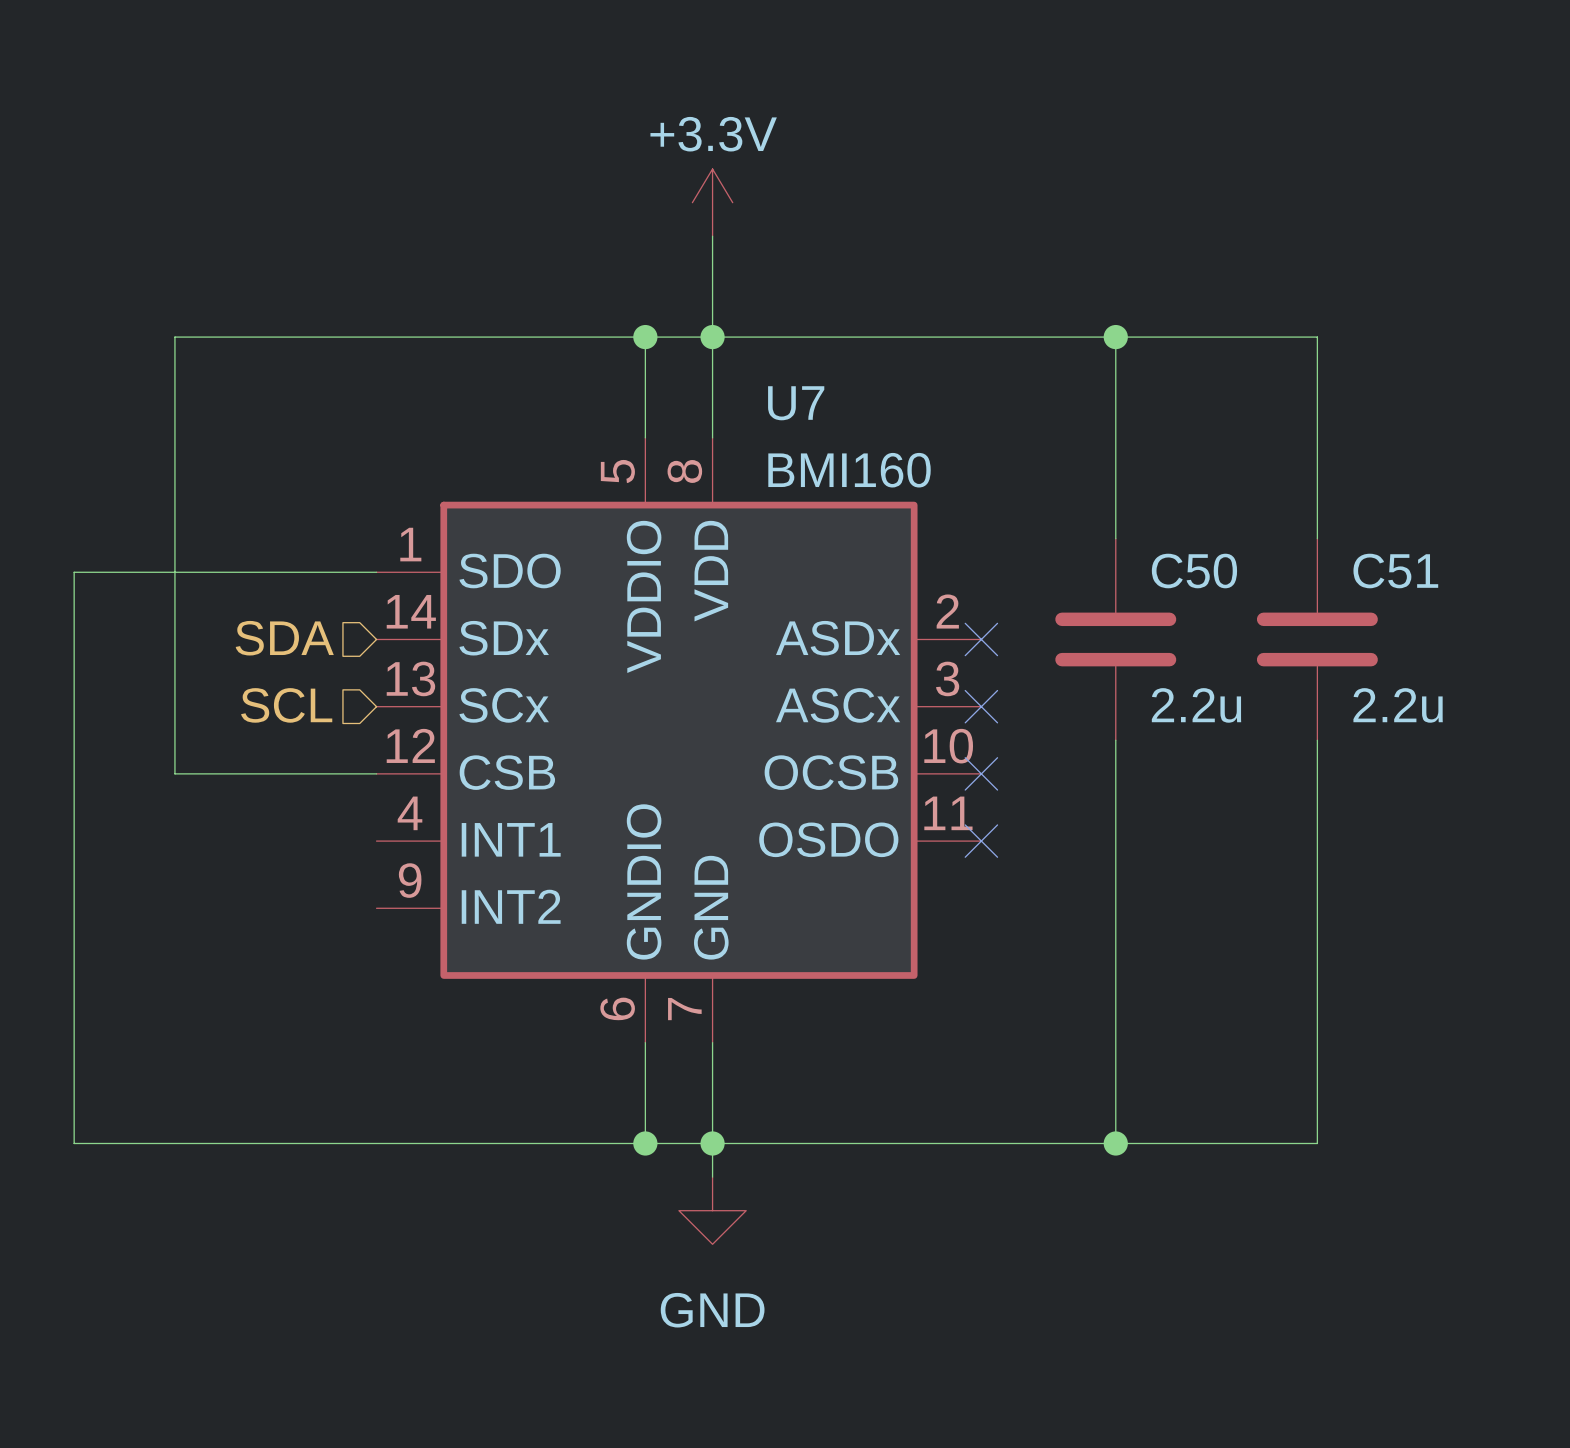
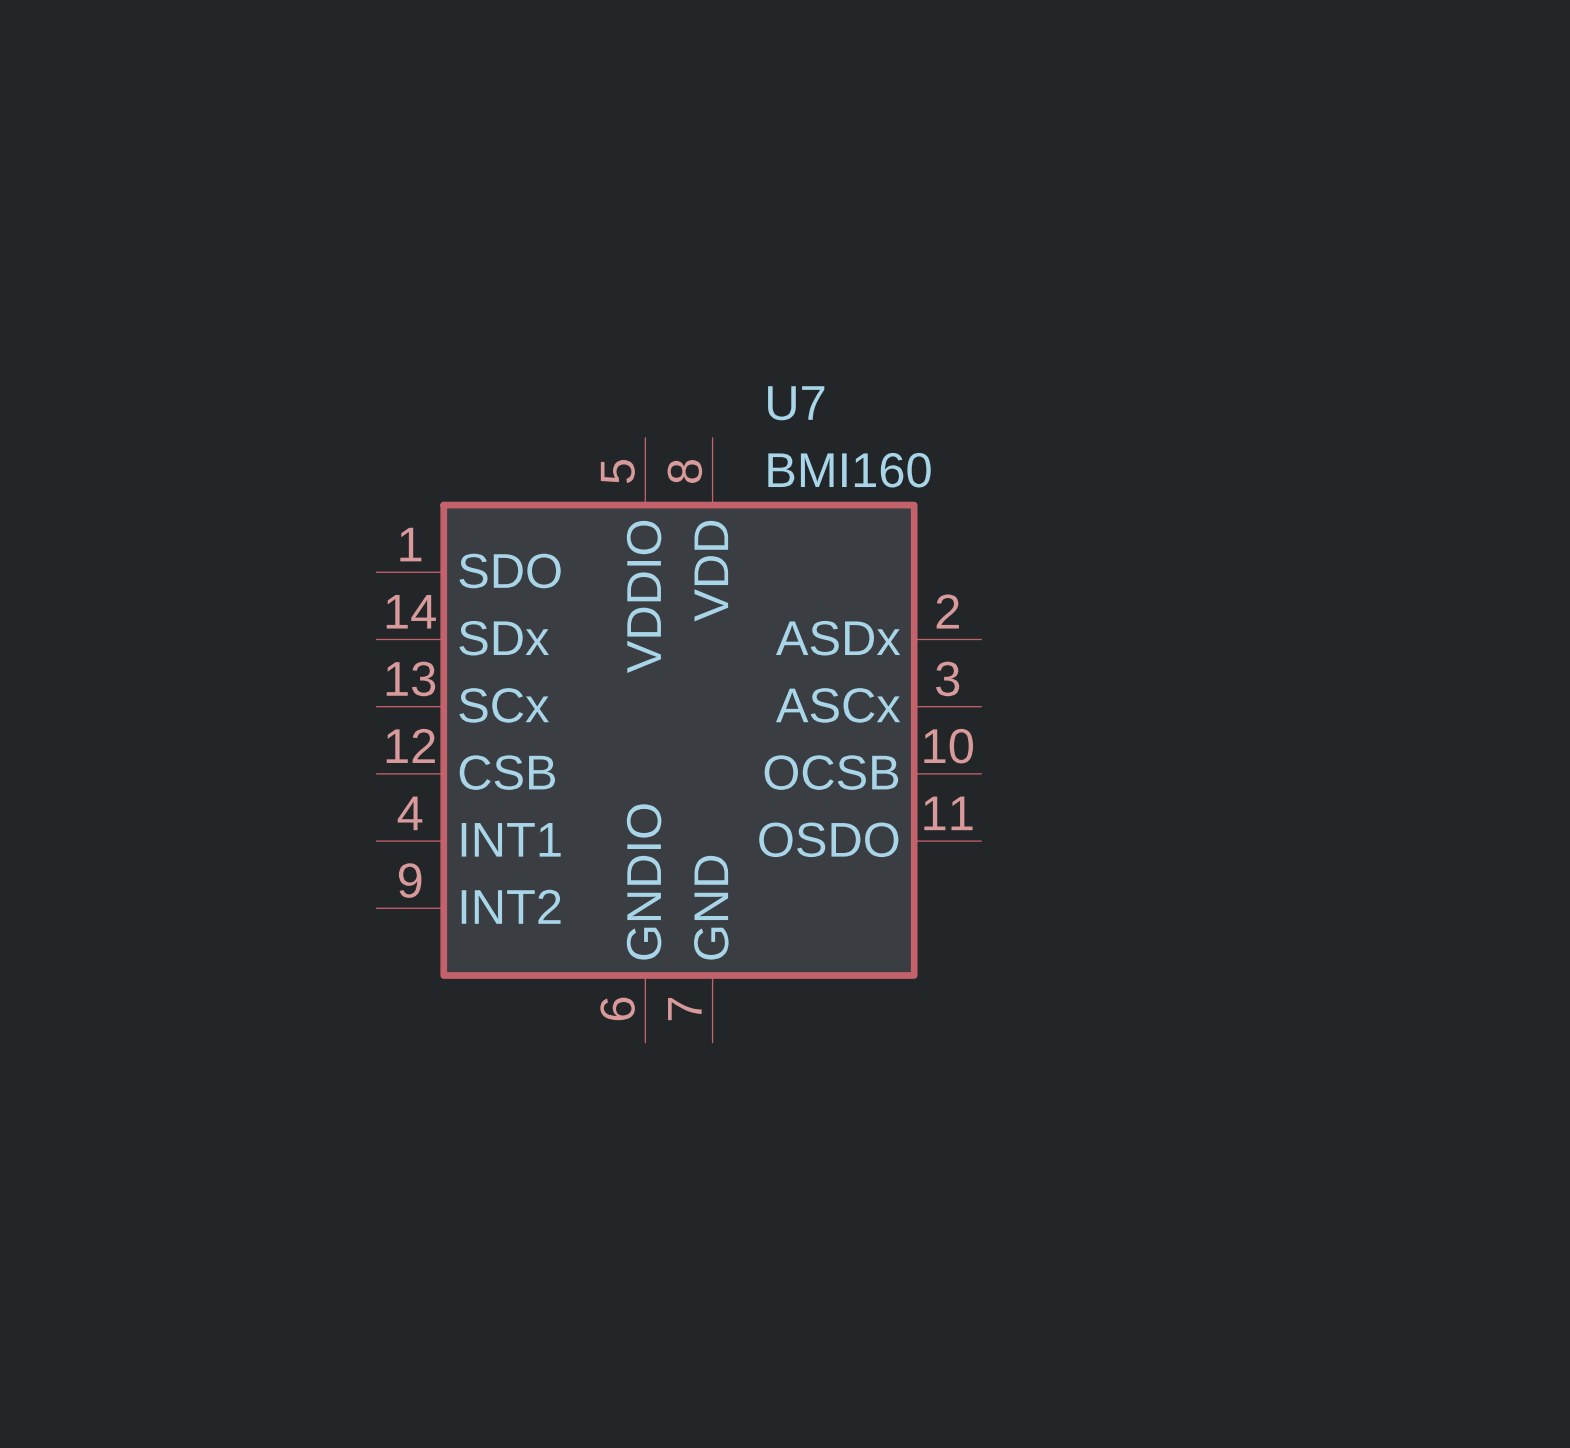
power symbol: +3.3V (712, 202) -> none
wire: (712, 236) (712, 437) -> none
wire: (645, 337) (645, 437) -> none
junction: (645, 337) -> none
junction: (712, 337) -> none
wire: (1115, 337) (1115, 538) -> none
junction: (1115, 337) -> none
wire: (1317, 538) (1317, 337) (174, 337) (174, 773) (376, 773) -> none
wire: (376, 572) (74, 572) (74, 1143) (1317, 1143) (1317, 740) -> none
hierarchical label: SDA (284, 638) -> none
no-connect mark: (981, 639) -> none
C50: 2.2u (1115, 639) -> none
C51: 2.2u (1317, 639) -> none
hierarchical label: SCL (286, 705) -> none
no-connect mark: (981, 706) -> none
wire: (1115, 740) (1115, 1143) -> none
no-connect mark: (981, 773) -> none
no-connect mark: (981, 841) -> none
wire: (645, 1042) (645, 1143) -> none
wire: (712, 1042) (712, 1177) -> none
junction: (645, 1143) -> none
junction: (712, 1143) -> none
junction: (1115, 1143) -> none
power symbol: GND (712, 1210) -> none

